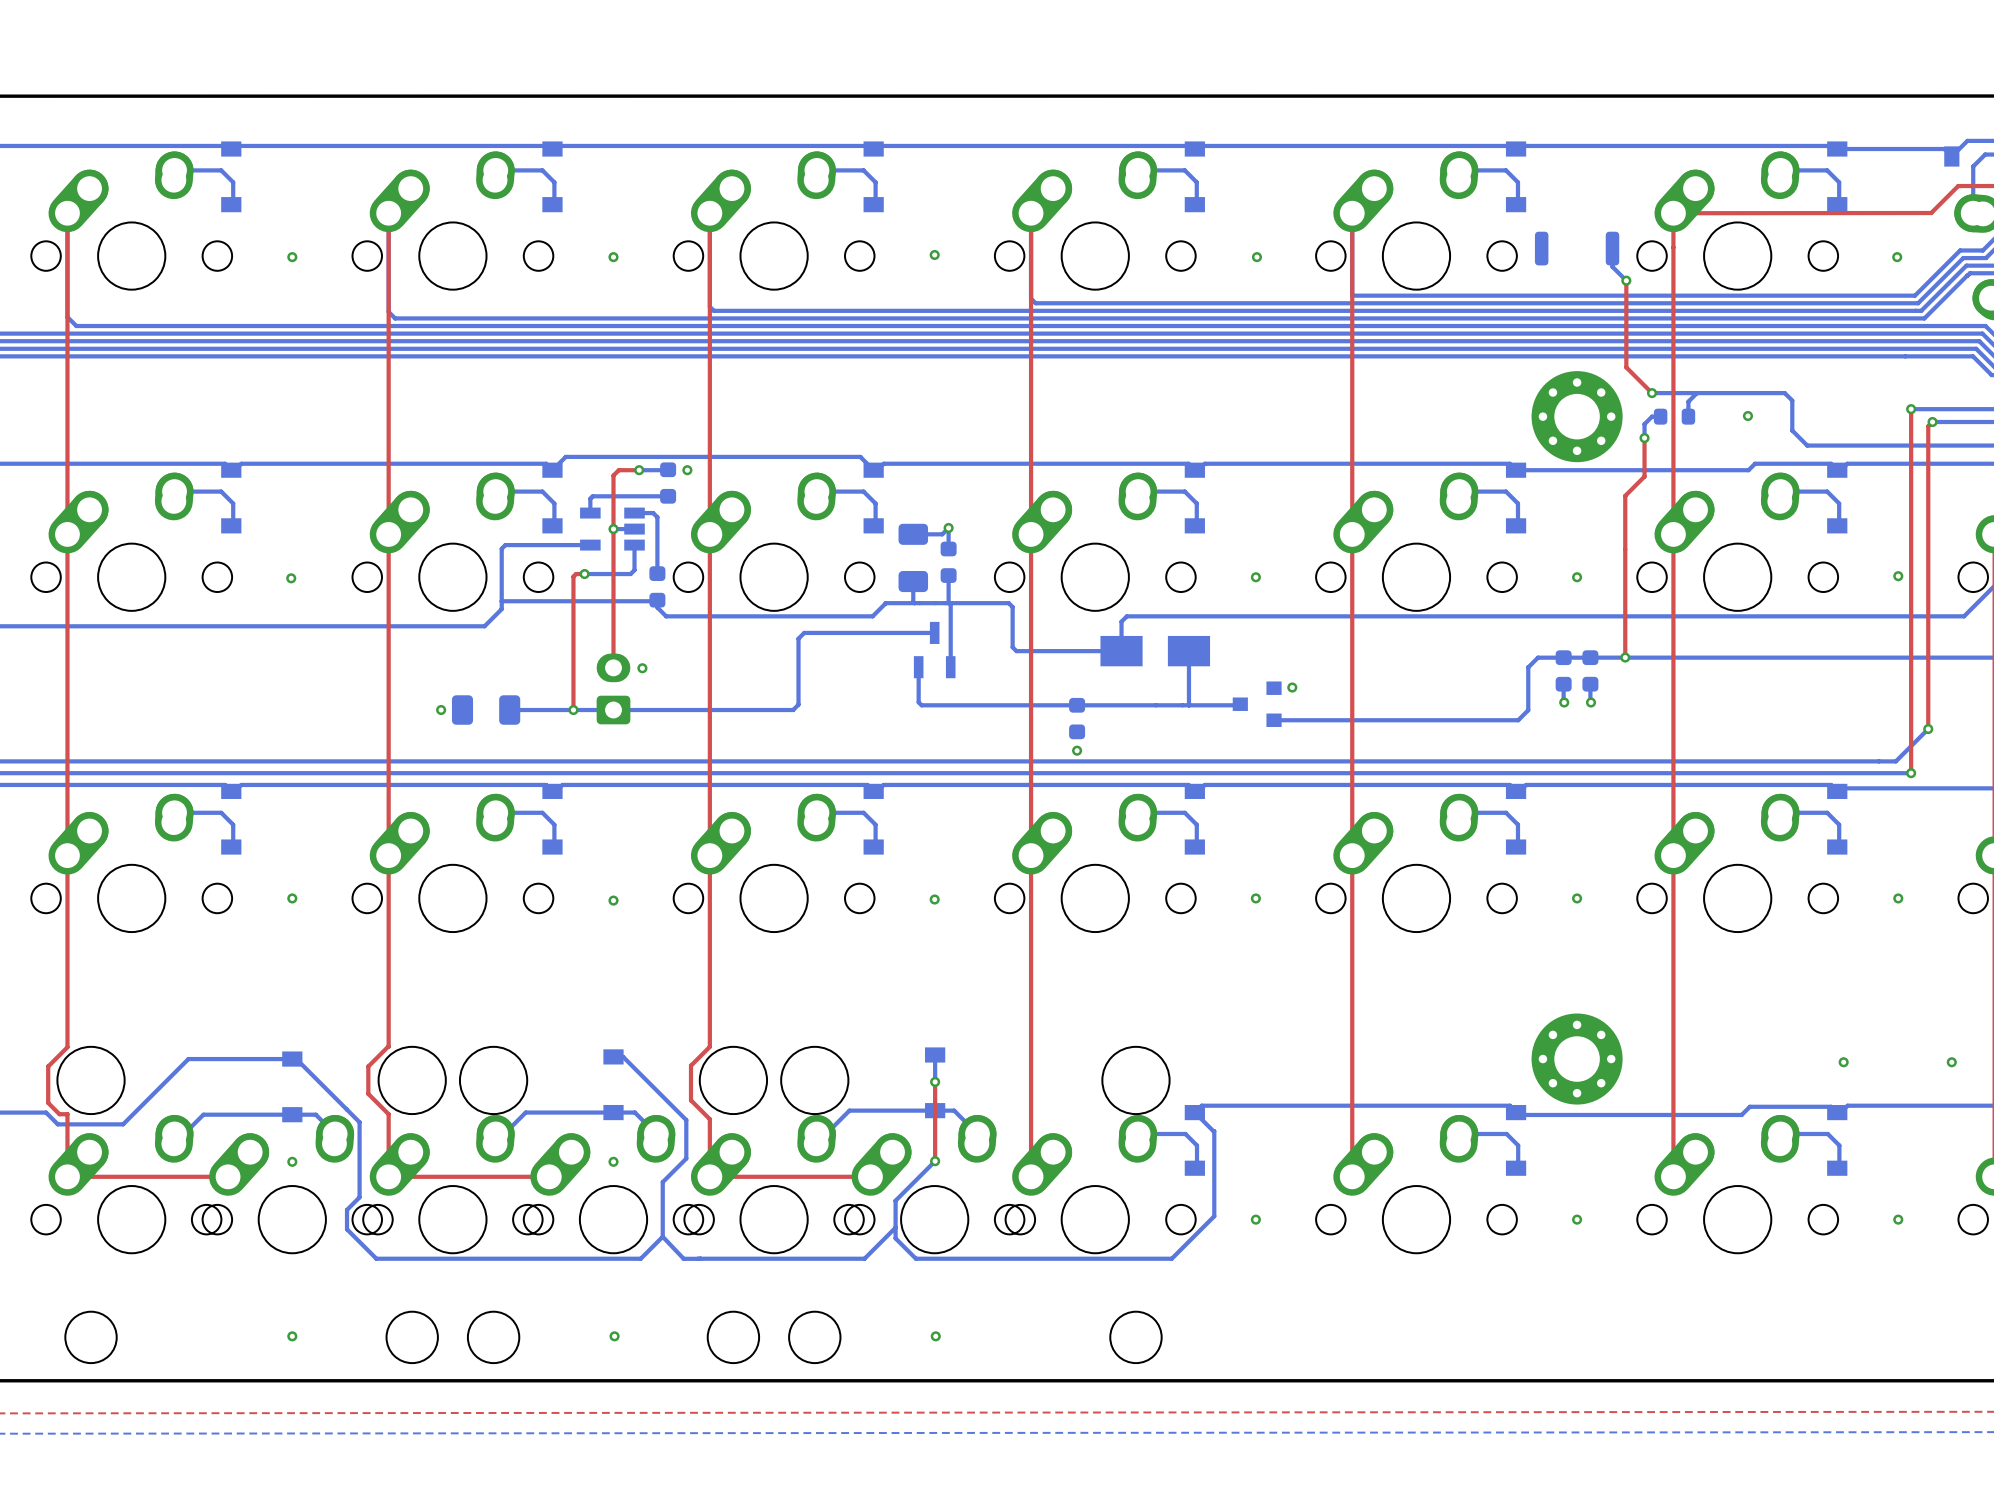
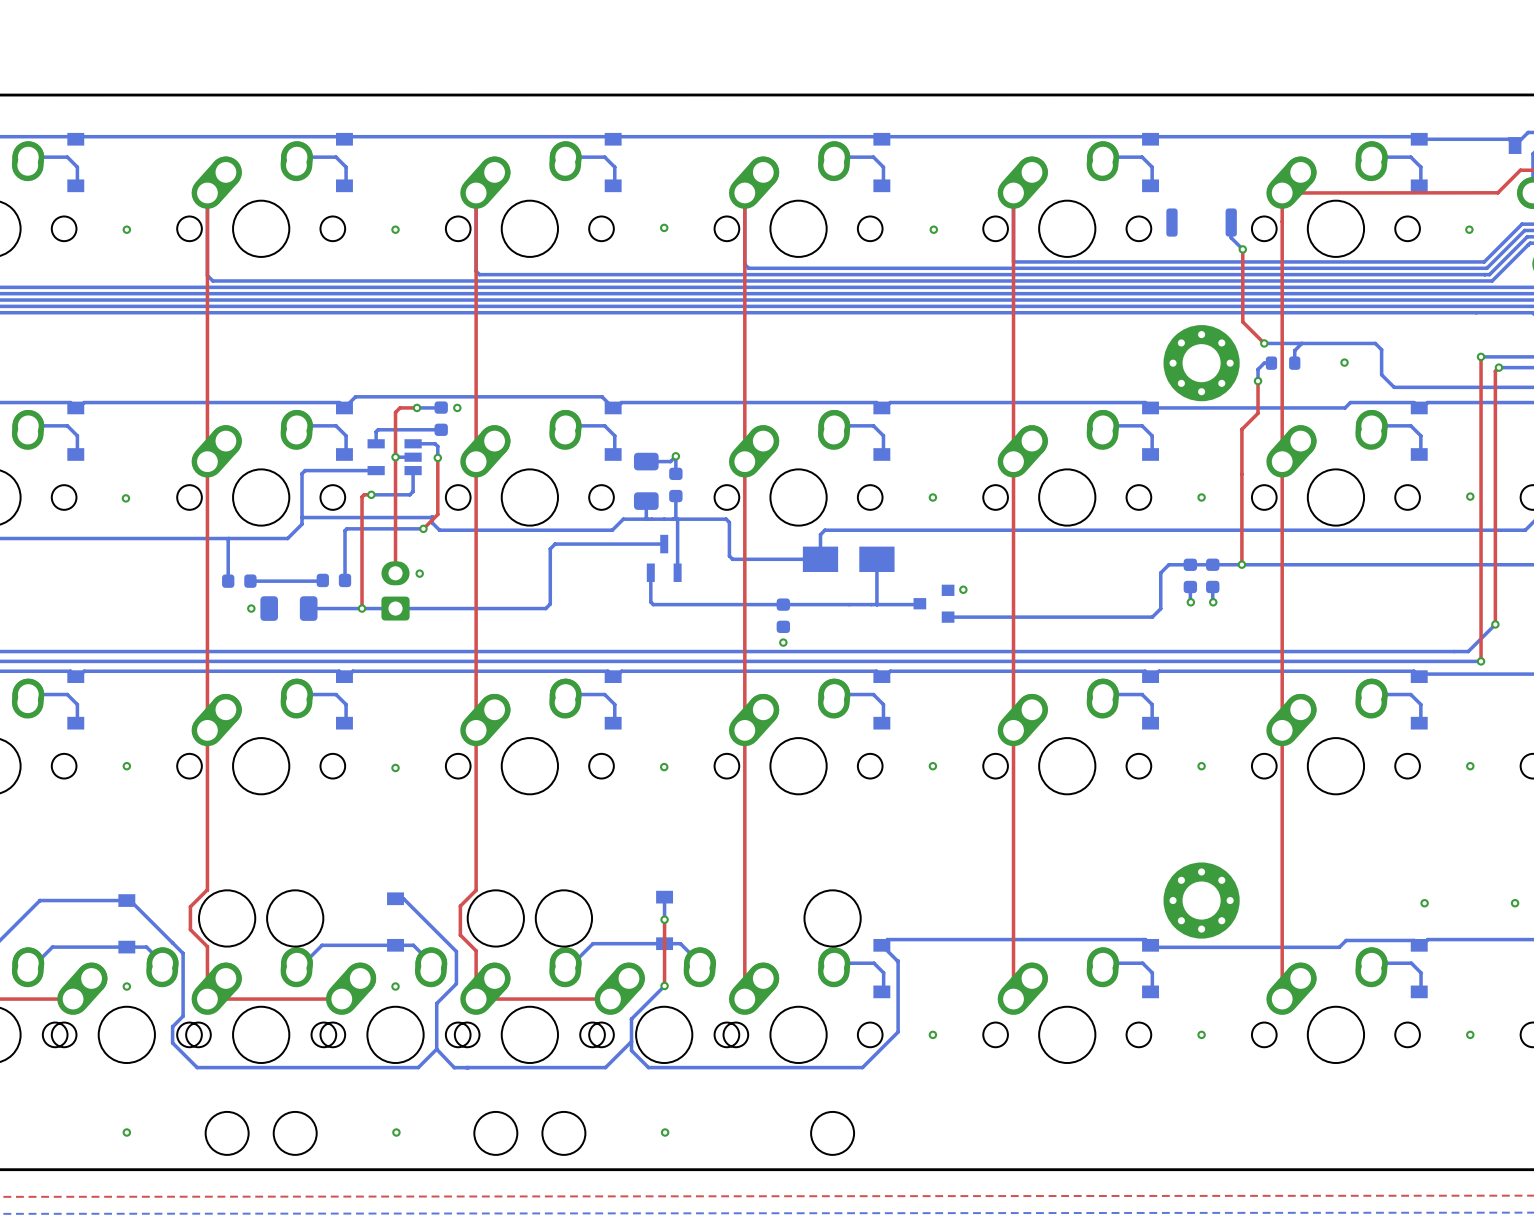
bottom track: (653, 513) (657, 517) (657, 573) -> (428, 443) (435, 443) (437, 446) (437, 457)
top track: none -> (437, 457) (437, 514) (423, 528)
via: none -> (437, 457)
part: (657, 586) -> none
bottom track: none -> (423, 528) (346, 528) (345, 530) (345, 580)
via: none -> (423, 528)
bottom track: none -> (228, 538) (228, 581)
bottom track: none -> (322, 580) (250, 581)
part: none -> (333, 580)
part: none -> (239, 581)

